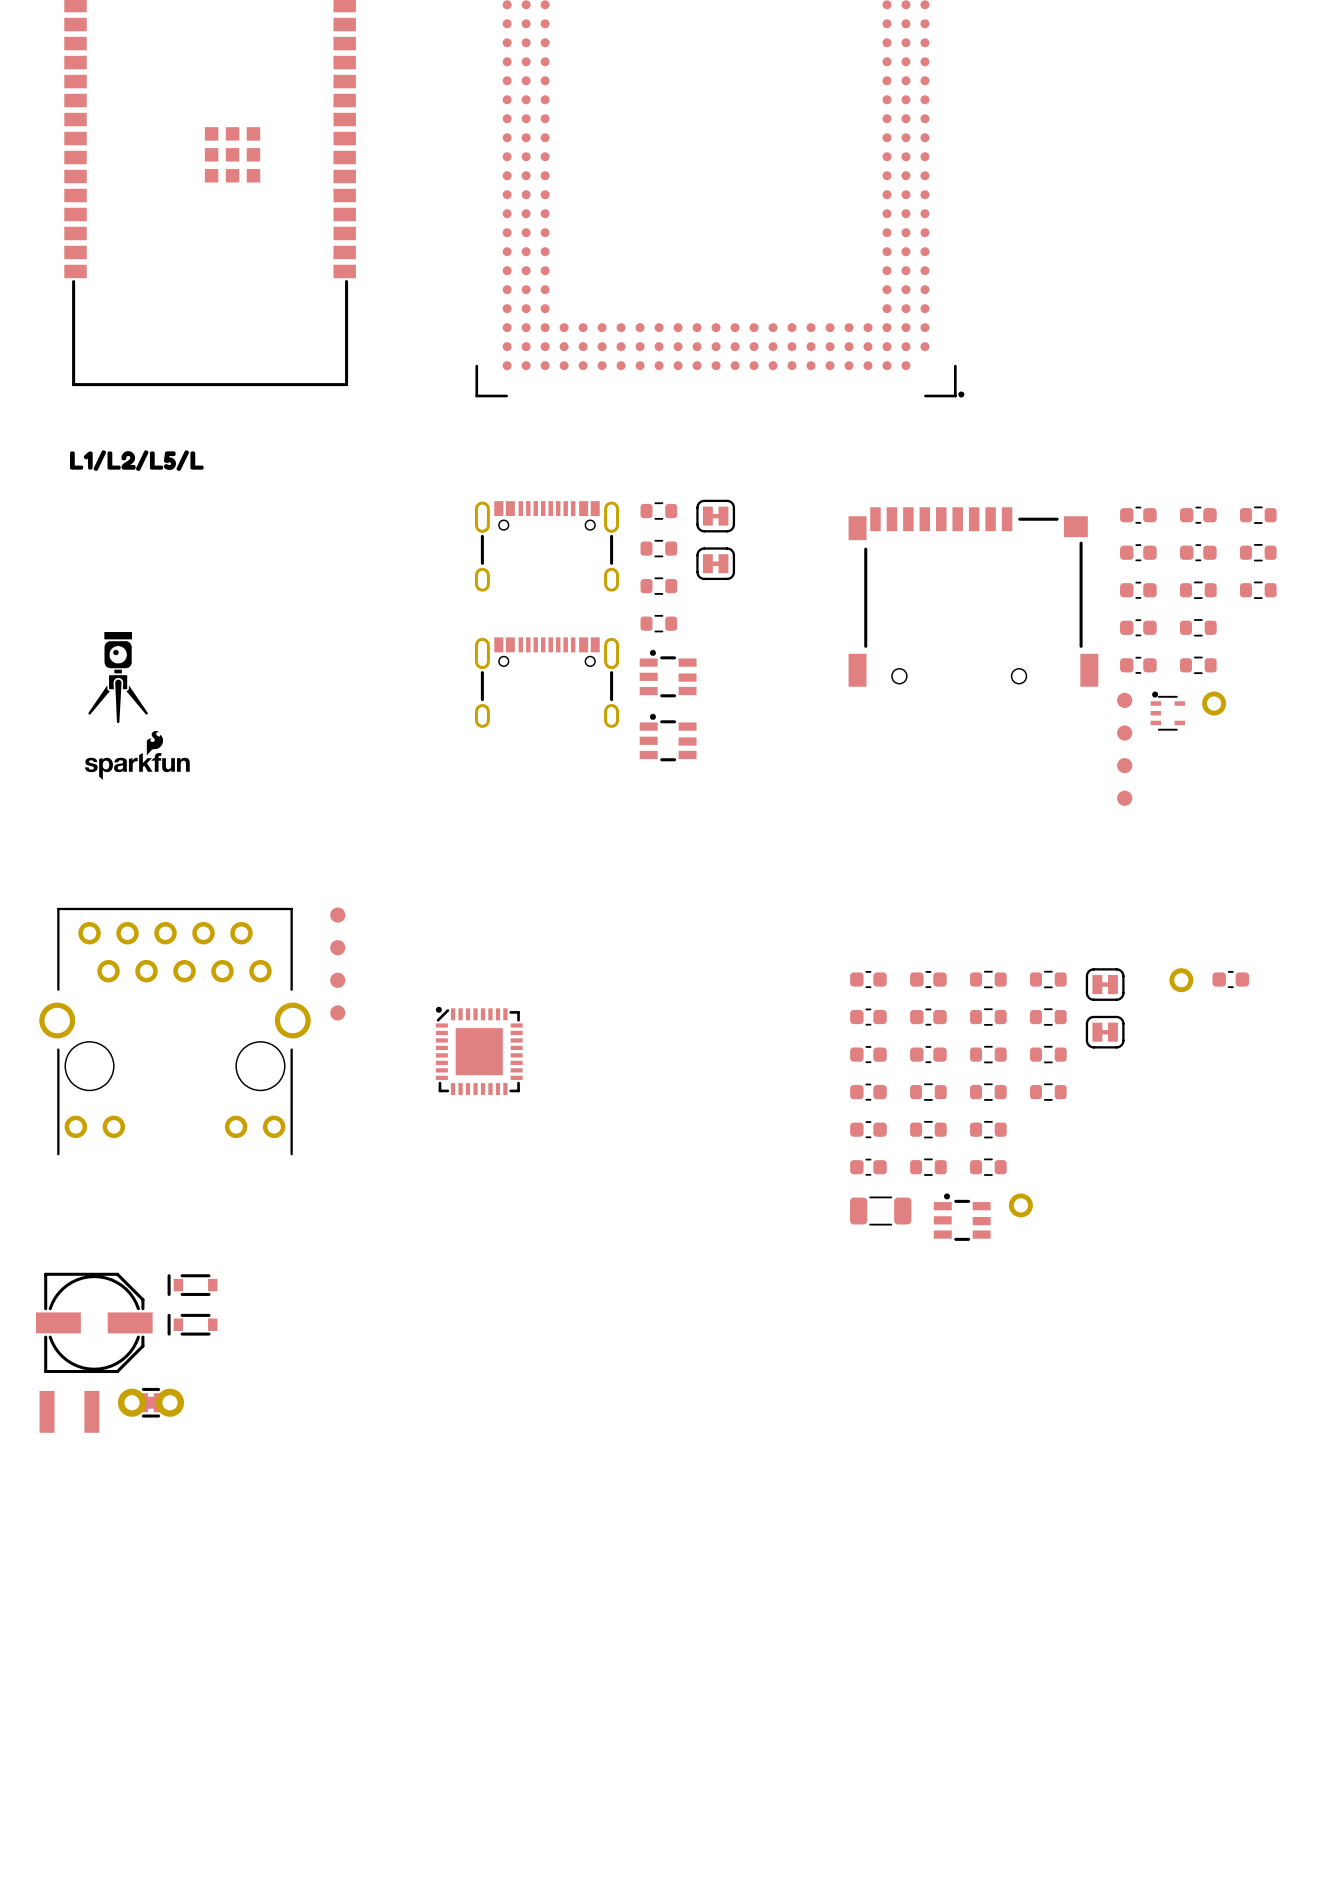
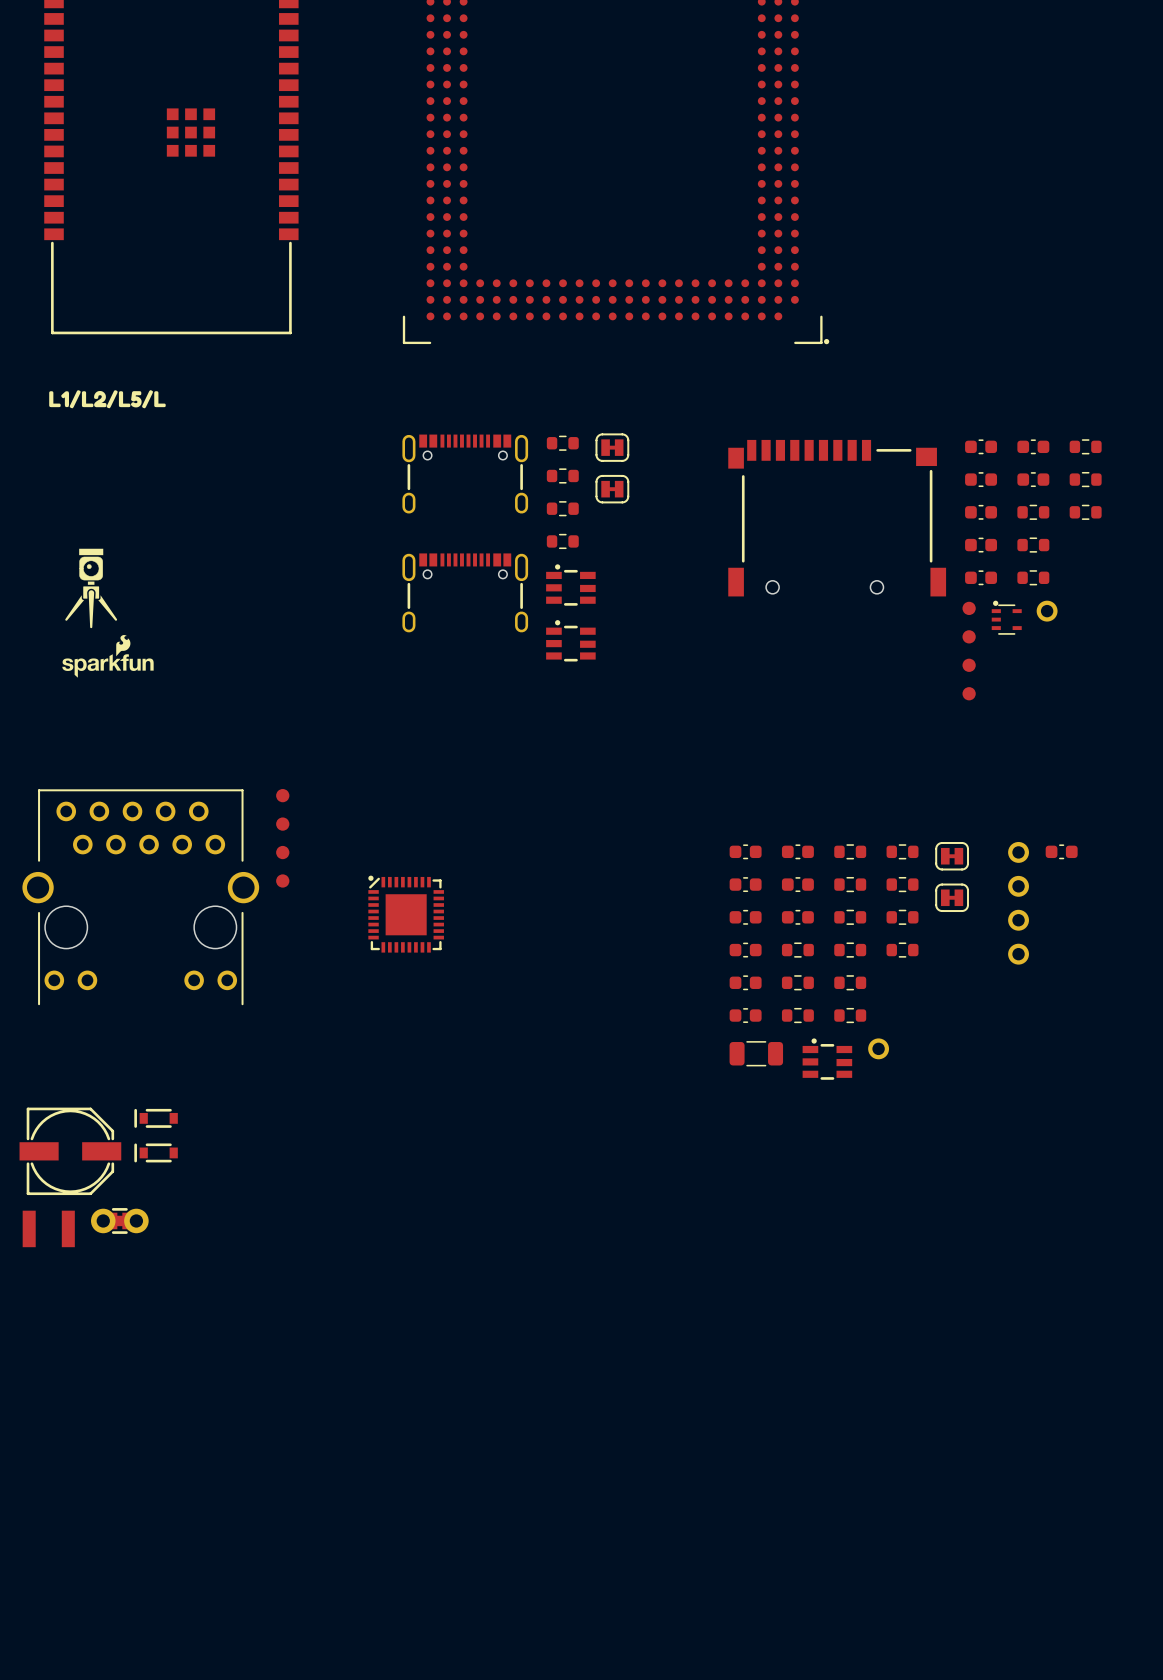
part: none -> (1018, 886)
part: none -> (1018, 920)
part: none -> (1018, 954)

